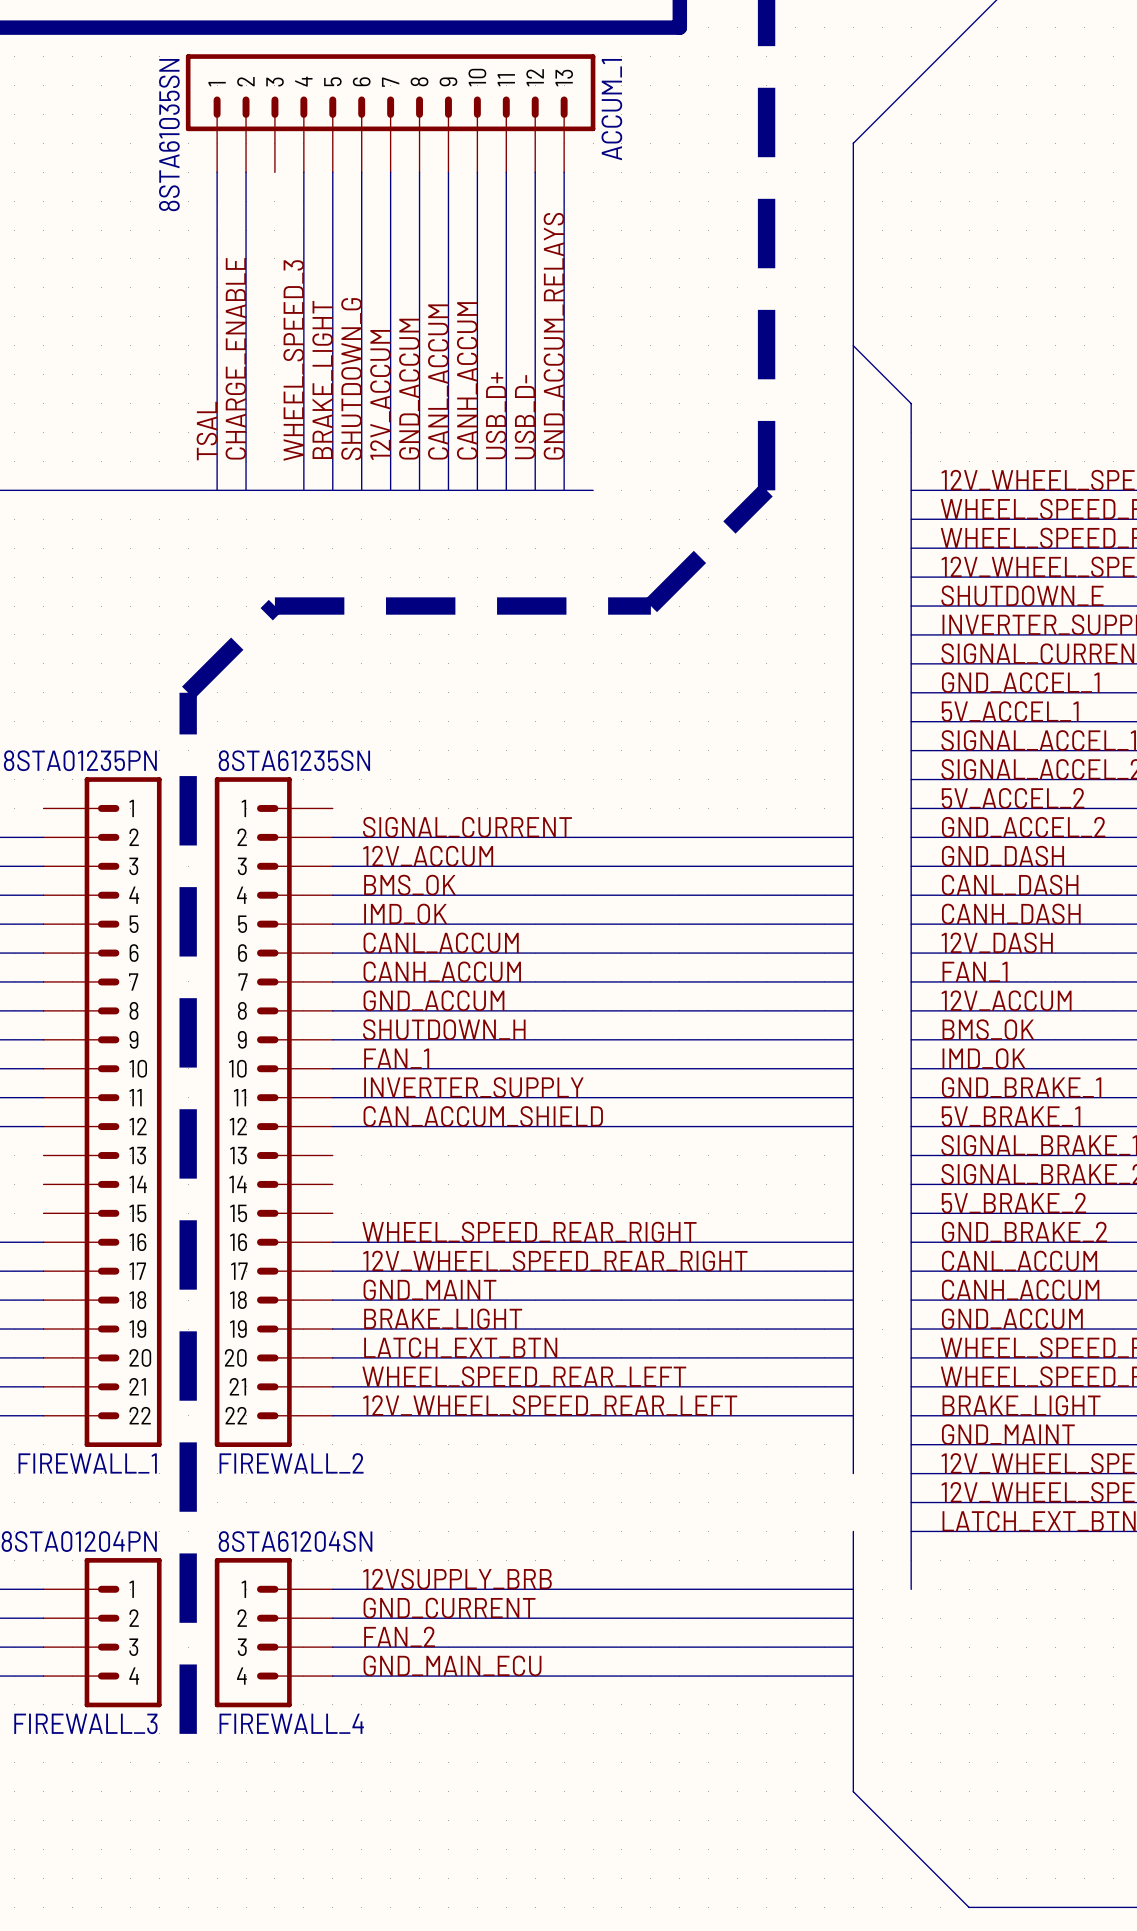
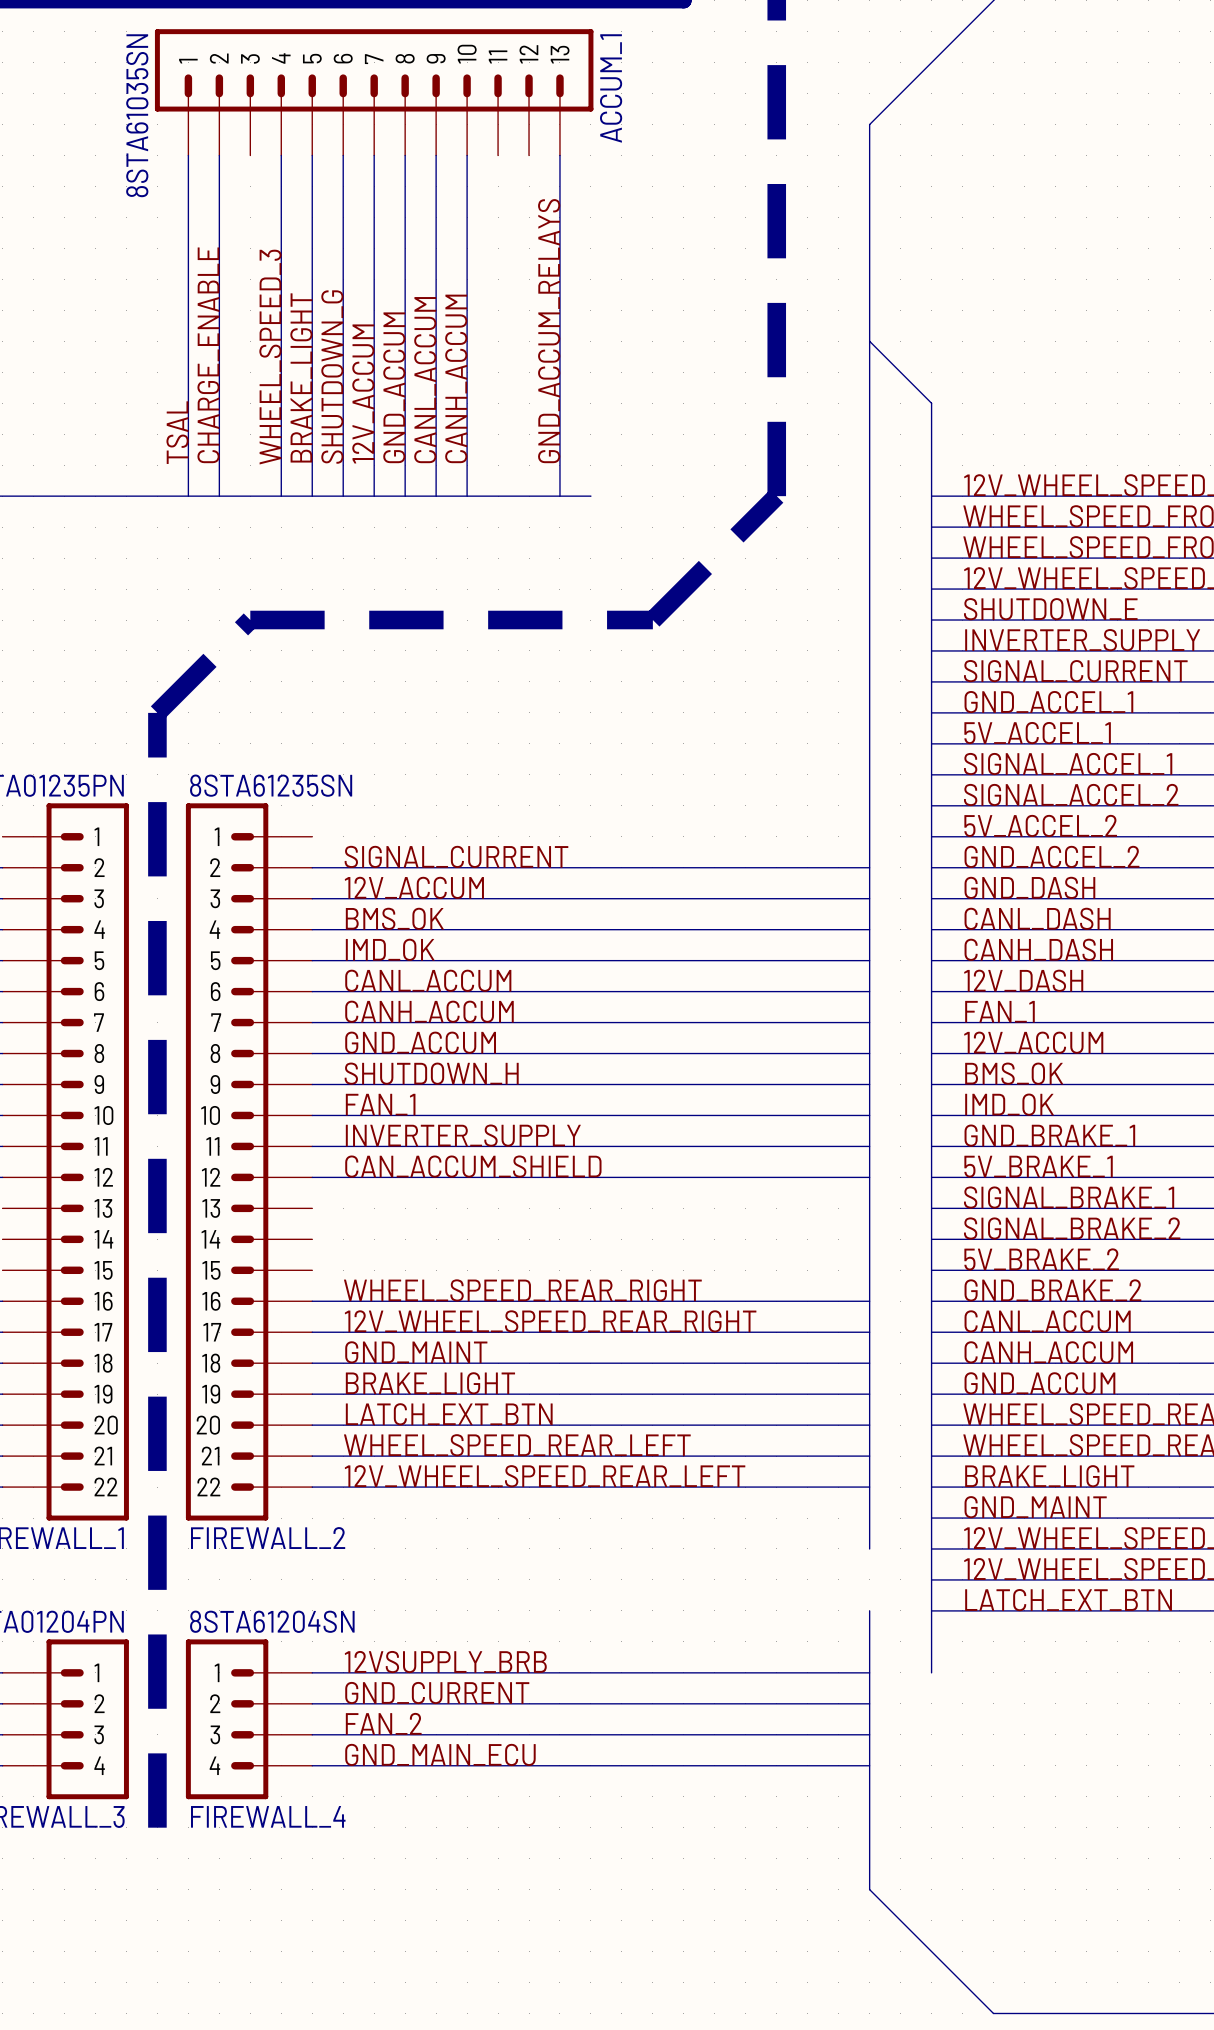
wire: (506, 172) (506, 490) -> none
wire: (535, 172) (535, 490) -> none
label: USB_D+ (496, 415) -> none
label: USB_D- (525, 417) -> none

